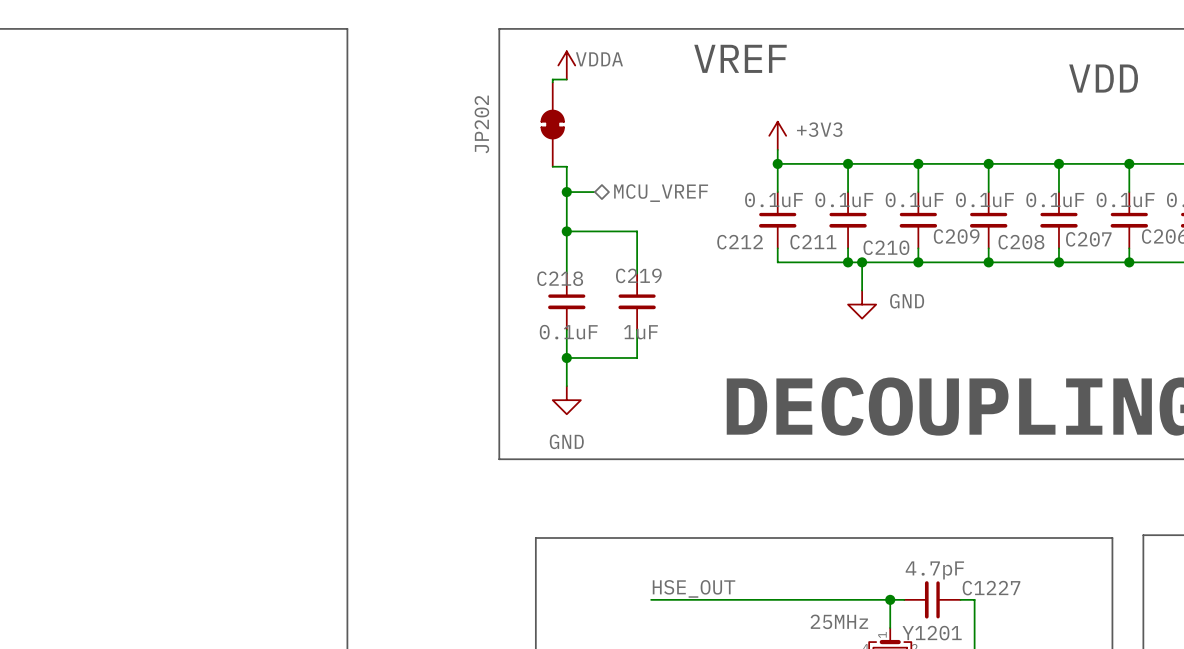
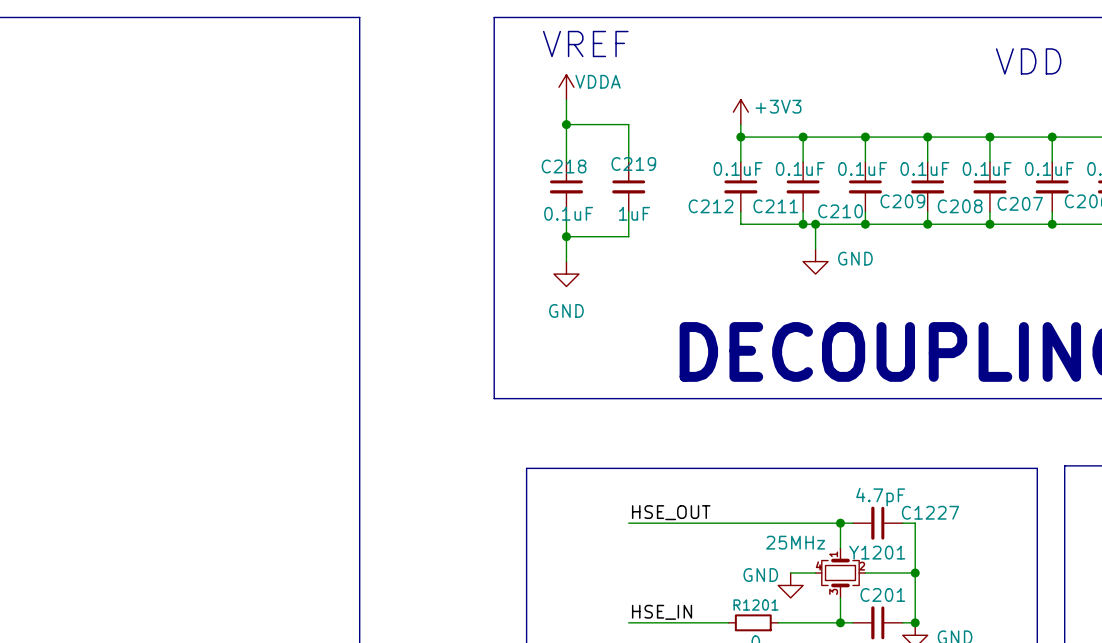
text position: VREF (740, 58) -> VREF (585, 43)
power symbol position: VDDA (566, 65) -> VDDA (566, 87)
wire: (566, 79) (552, 79) (552, 82) -> none
wire: none -> (566, 99) (566, 161)
JP202: (552, 124) -> none
junction: none -> (566, 124)
wire: (552, 166) (566, 166) (566, 273) -> none
wire: (566, 192) (594, 192) -> none
junction: (566, 192) -> none
hierarchical label: MCU_VREF (661, 193) -> none
wire: (566, 231) (637, 231) (637, 273) -> (566, 124) (628, 124) (628, 161)
junction: (566, 231) -> none
junction: none -> (566, 236)
C218 position: (566, 301) -> (566, 186)
C219 position: (637, 301) -> (628, 186)
wire: (566, 329) (566, 386) -> (566, 211) (566, 261)
wire: (637, 329) (637, 357) (566, 357) -> (628, 211) (628, 236) (566, 236)
junction: (566, 357) -> none
power symbol position: GND (566, 400) -> GND (566, 274)

